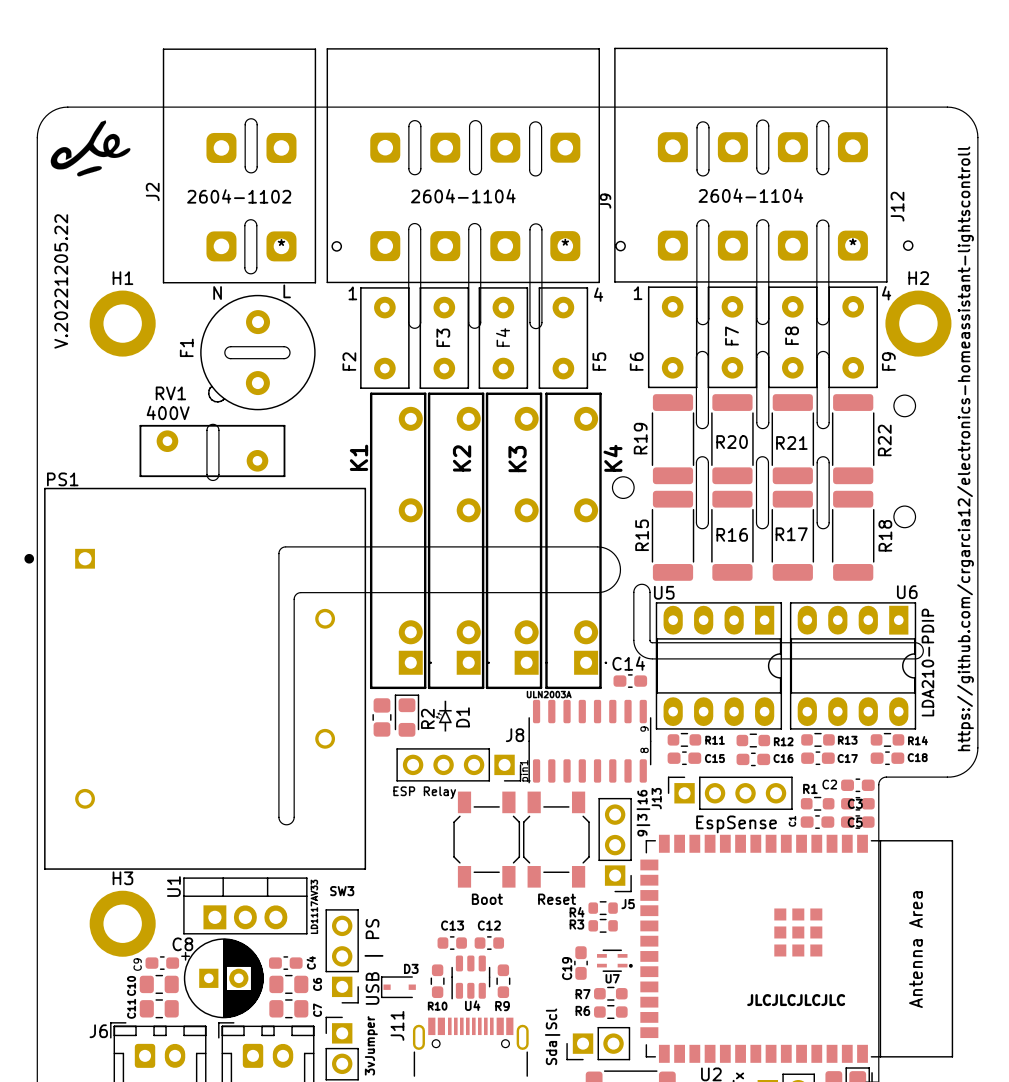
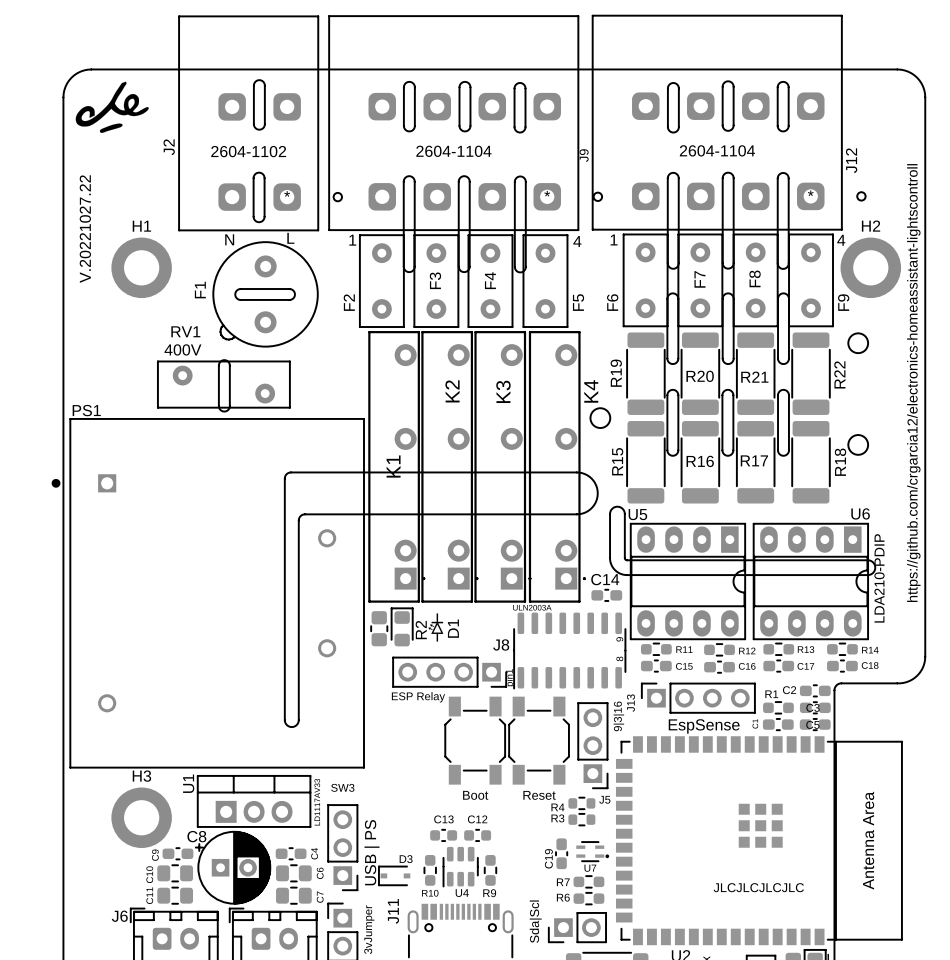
text: V.20221205.22 (61, 281) -> V.20221027.22 (85, 229)
K1 name position: K1 (359, 457) -> K1 (393, 466)

